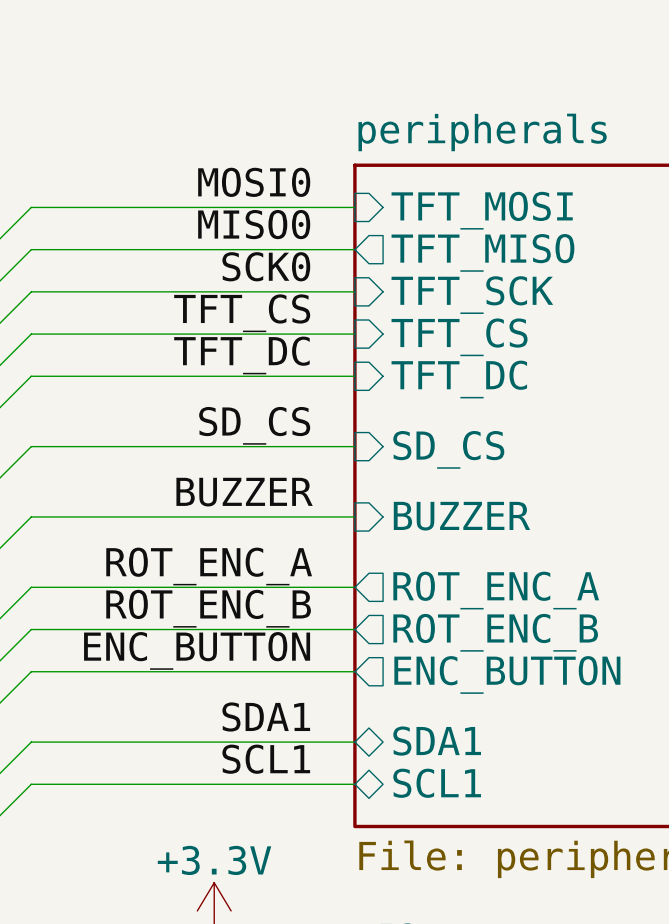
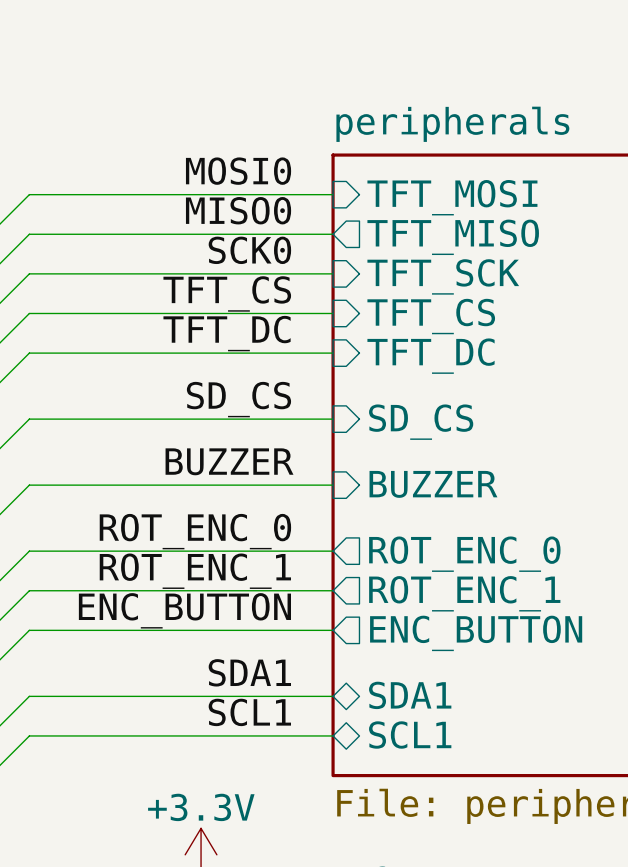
label: ROT_ENC_A (209, 566) -> ROT_ENC_0 (195, 531)
sheet pin: ROT_ENC_A (496, 590) -> ROT_ENC_0 (464, 554)
label: ROT_ENC_B (208, 608) -> ROT_ENC_1 (195, 571)
sheet pin: ROT_ENC_B (495, 632) -> ROT_ENC_1 (464, 593)

